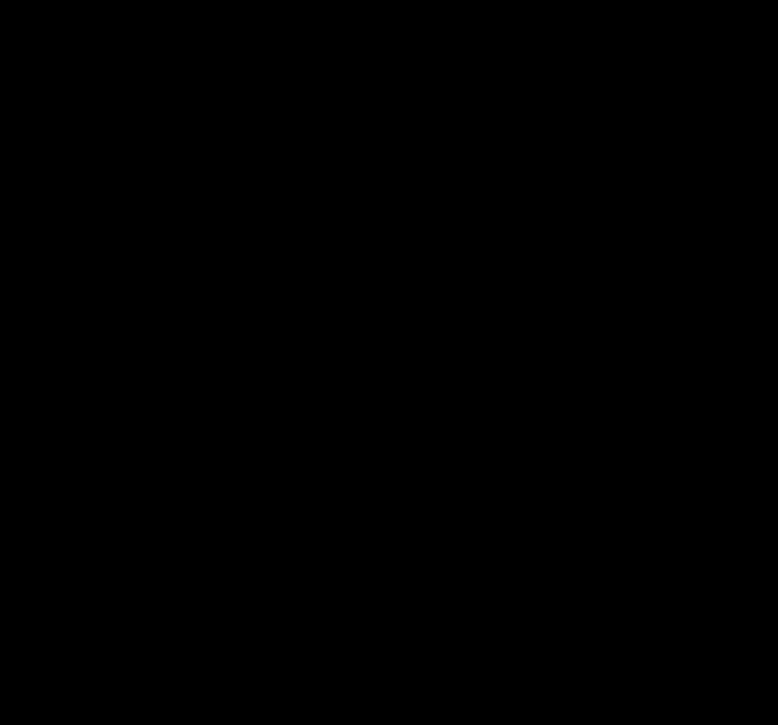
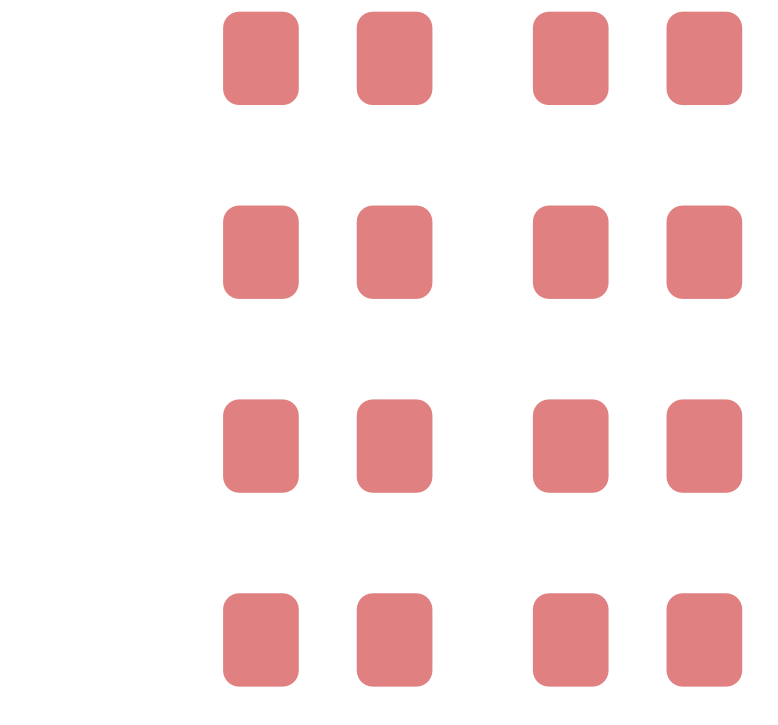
part: none -> (327, 58)
part: none -> (637, 58)
part: none -> (327, 252)
part: none -> (637, 252)
part: none -> (327, 446)
part: none -> (637, 446)
part: none -> (327, 639)
part: none -> (637, 639)

